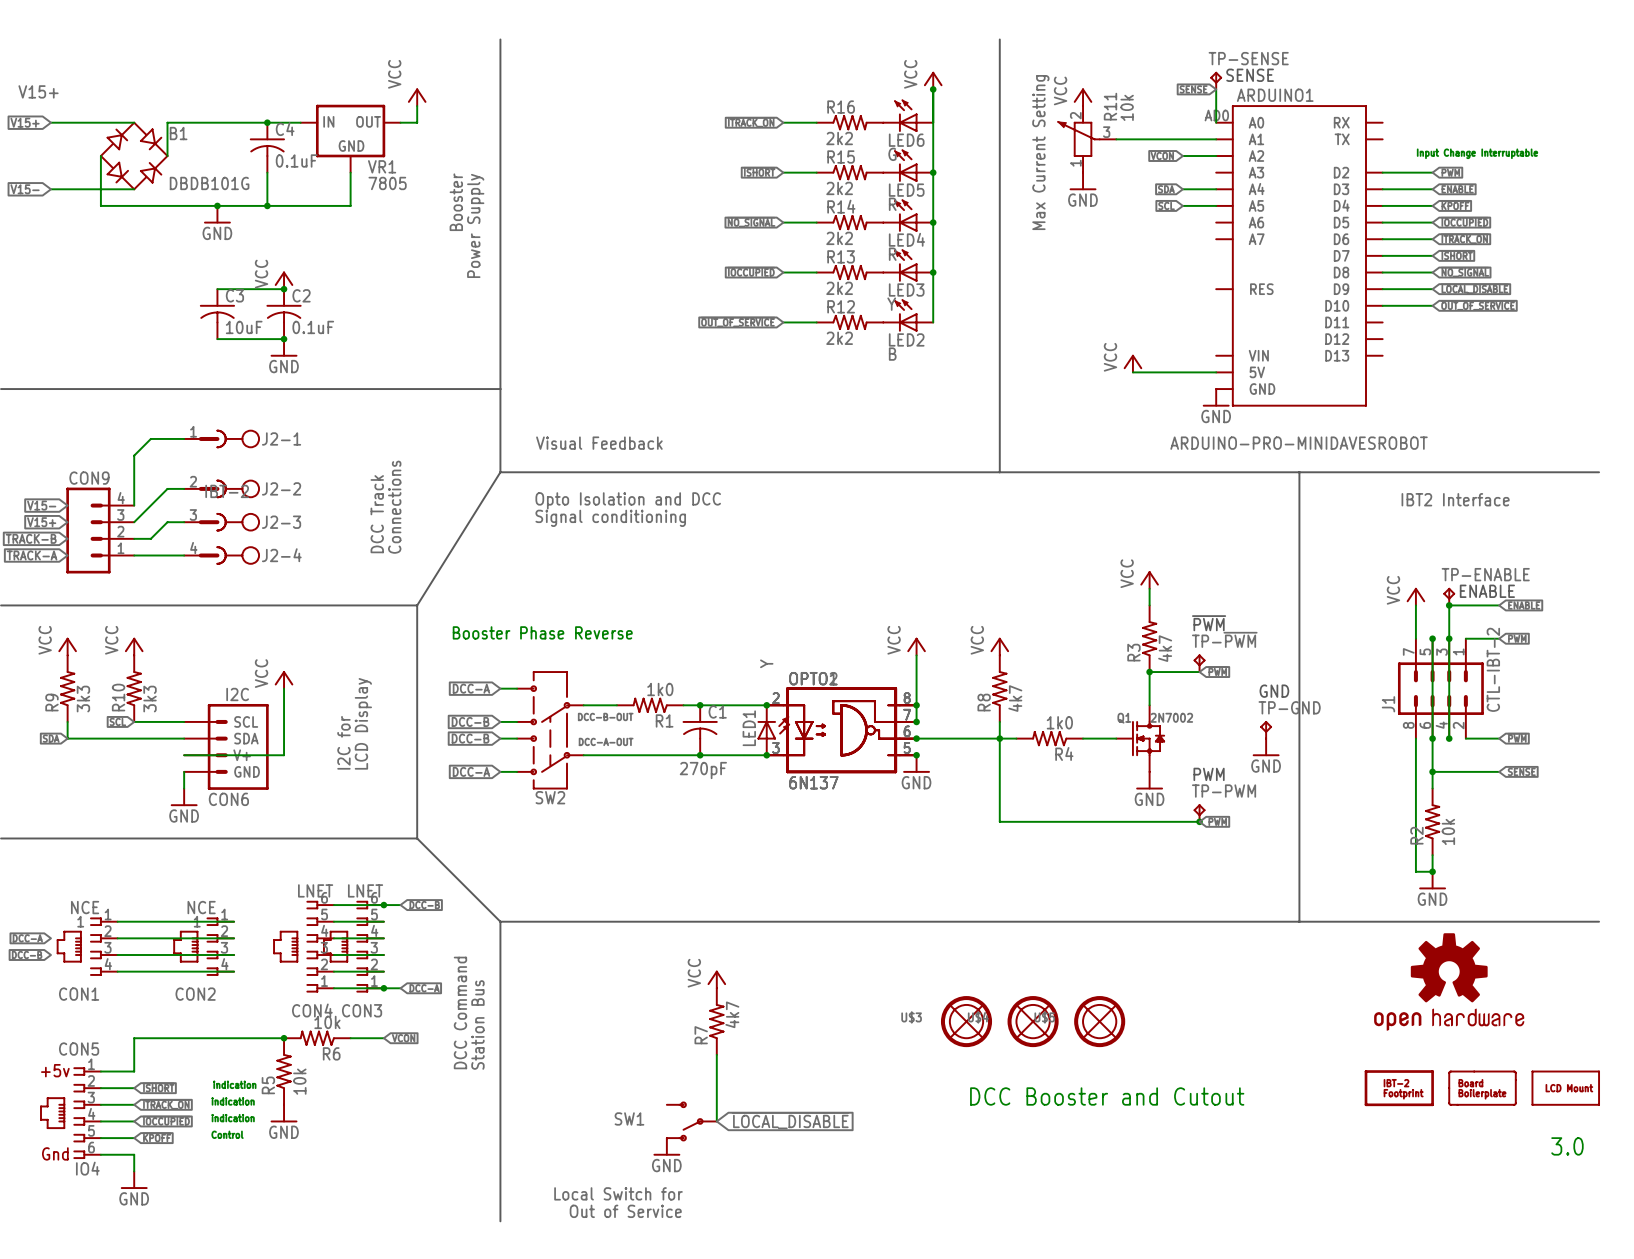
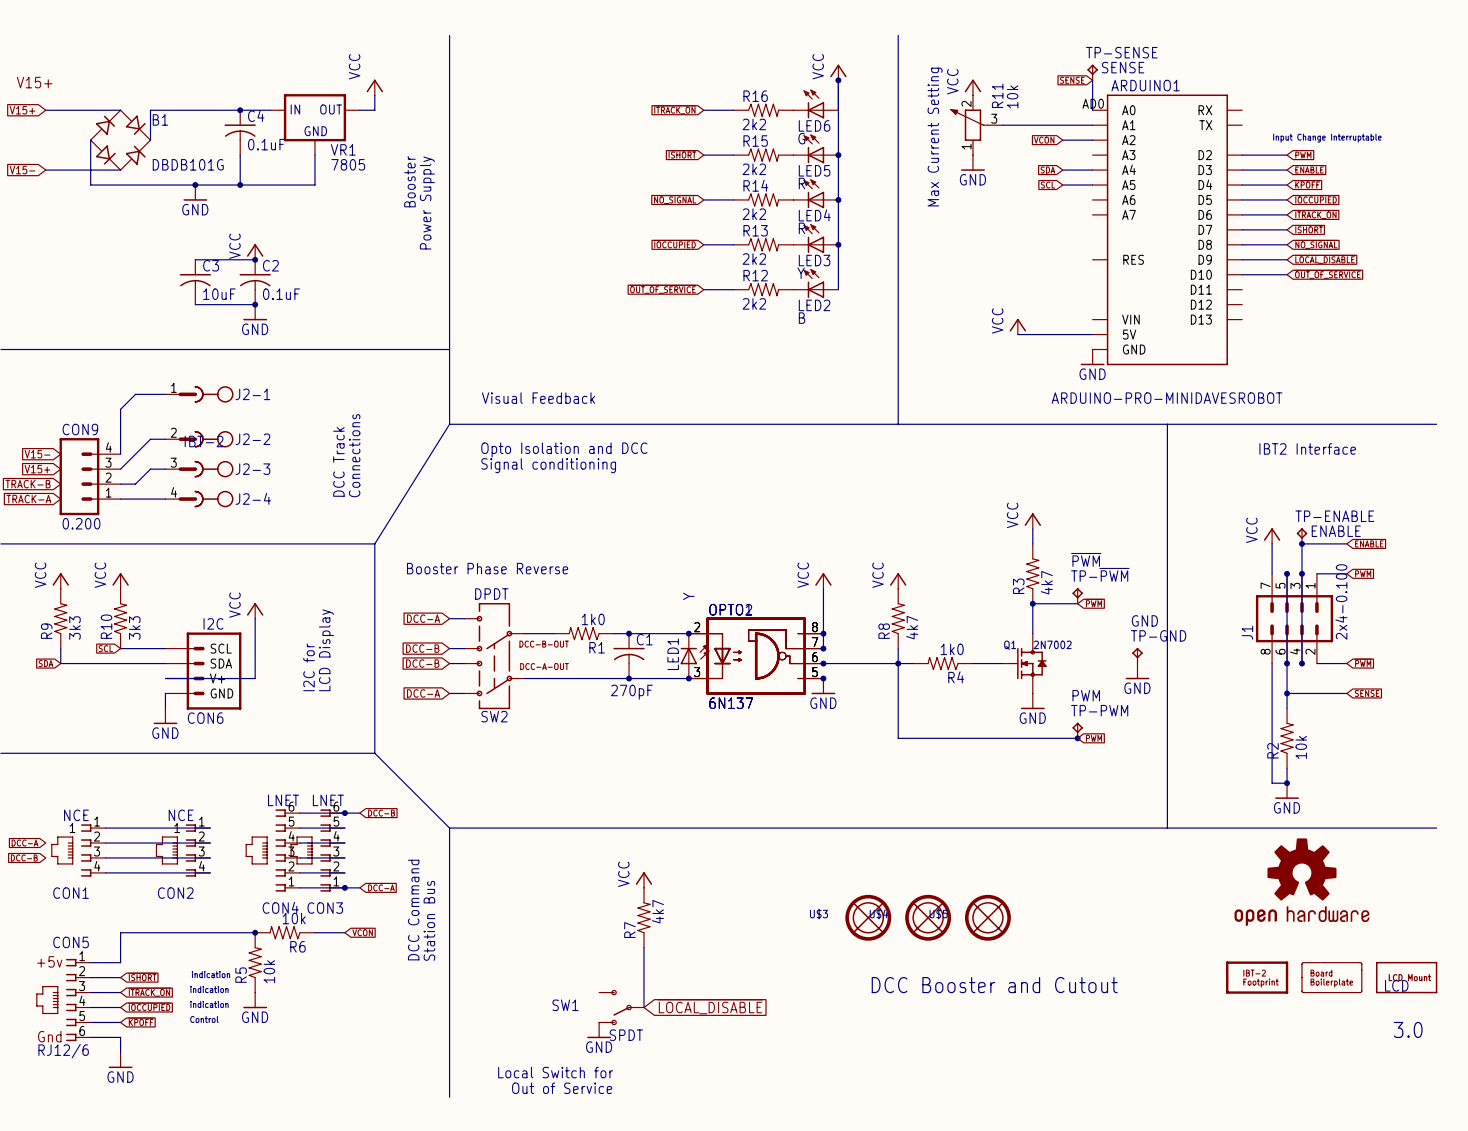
CON9 value: none -> 0.200 (81, 523)
SW2 value: none -> DPDT (491, 594)
J1 value: CTL-IBT-2 (1493, 669) -> 2x4-0.100 (1341, 601)
part value: none -> LCD (1396, 985)
SW1 value: none -> SPDT (626, 1035)
CON5 value: IO4 (87, 1168) -> RJ12/6 (63, 1051)

